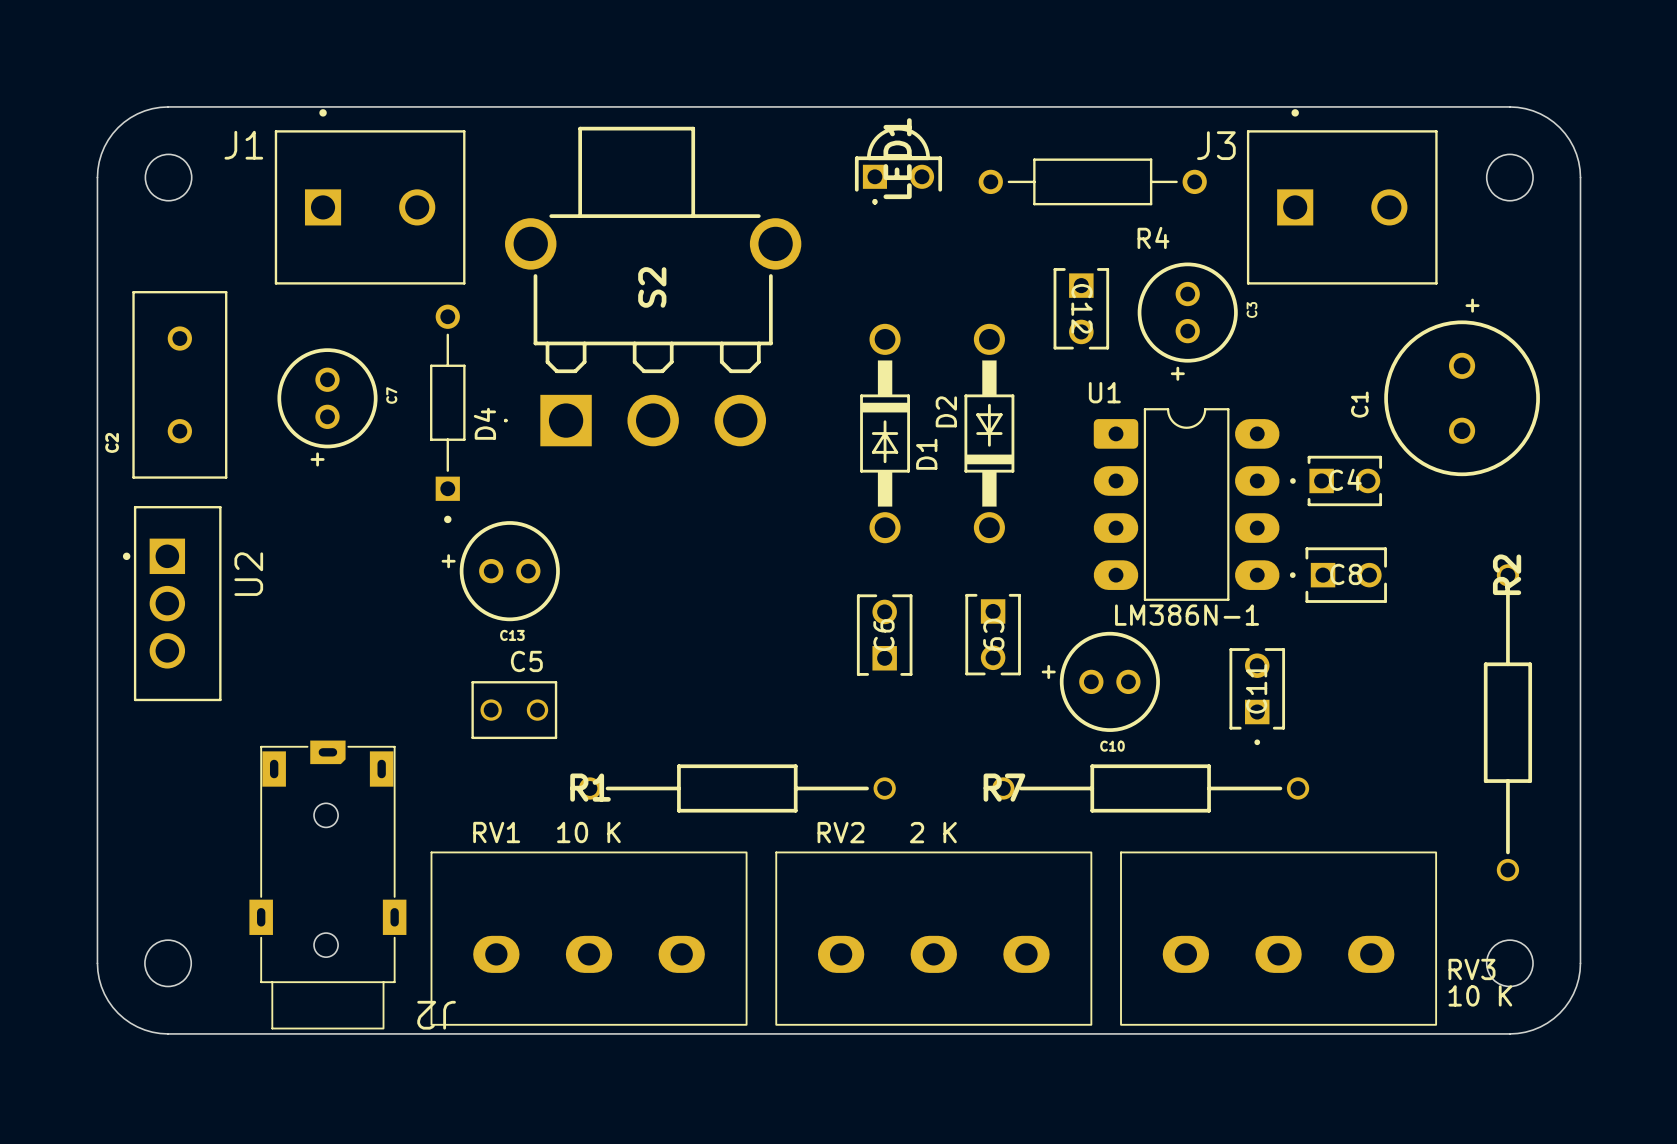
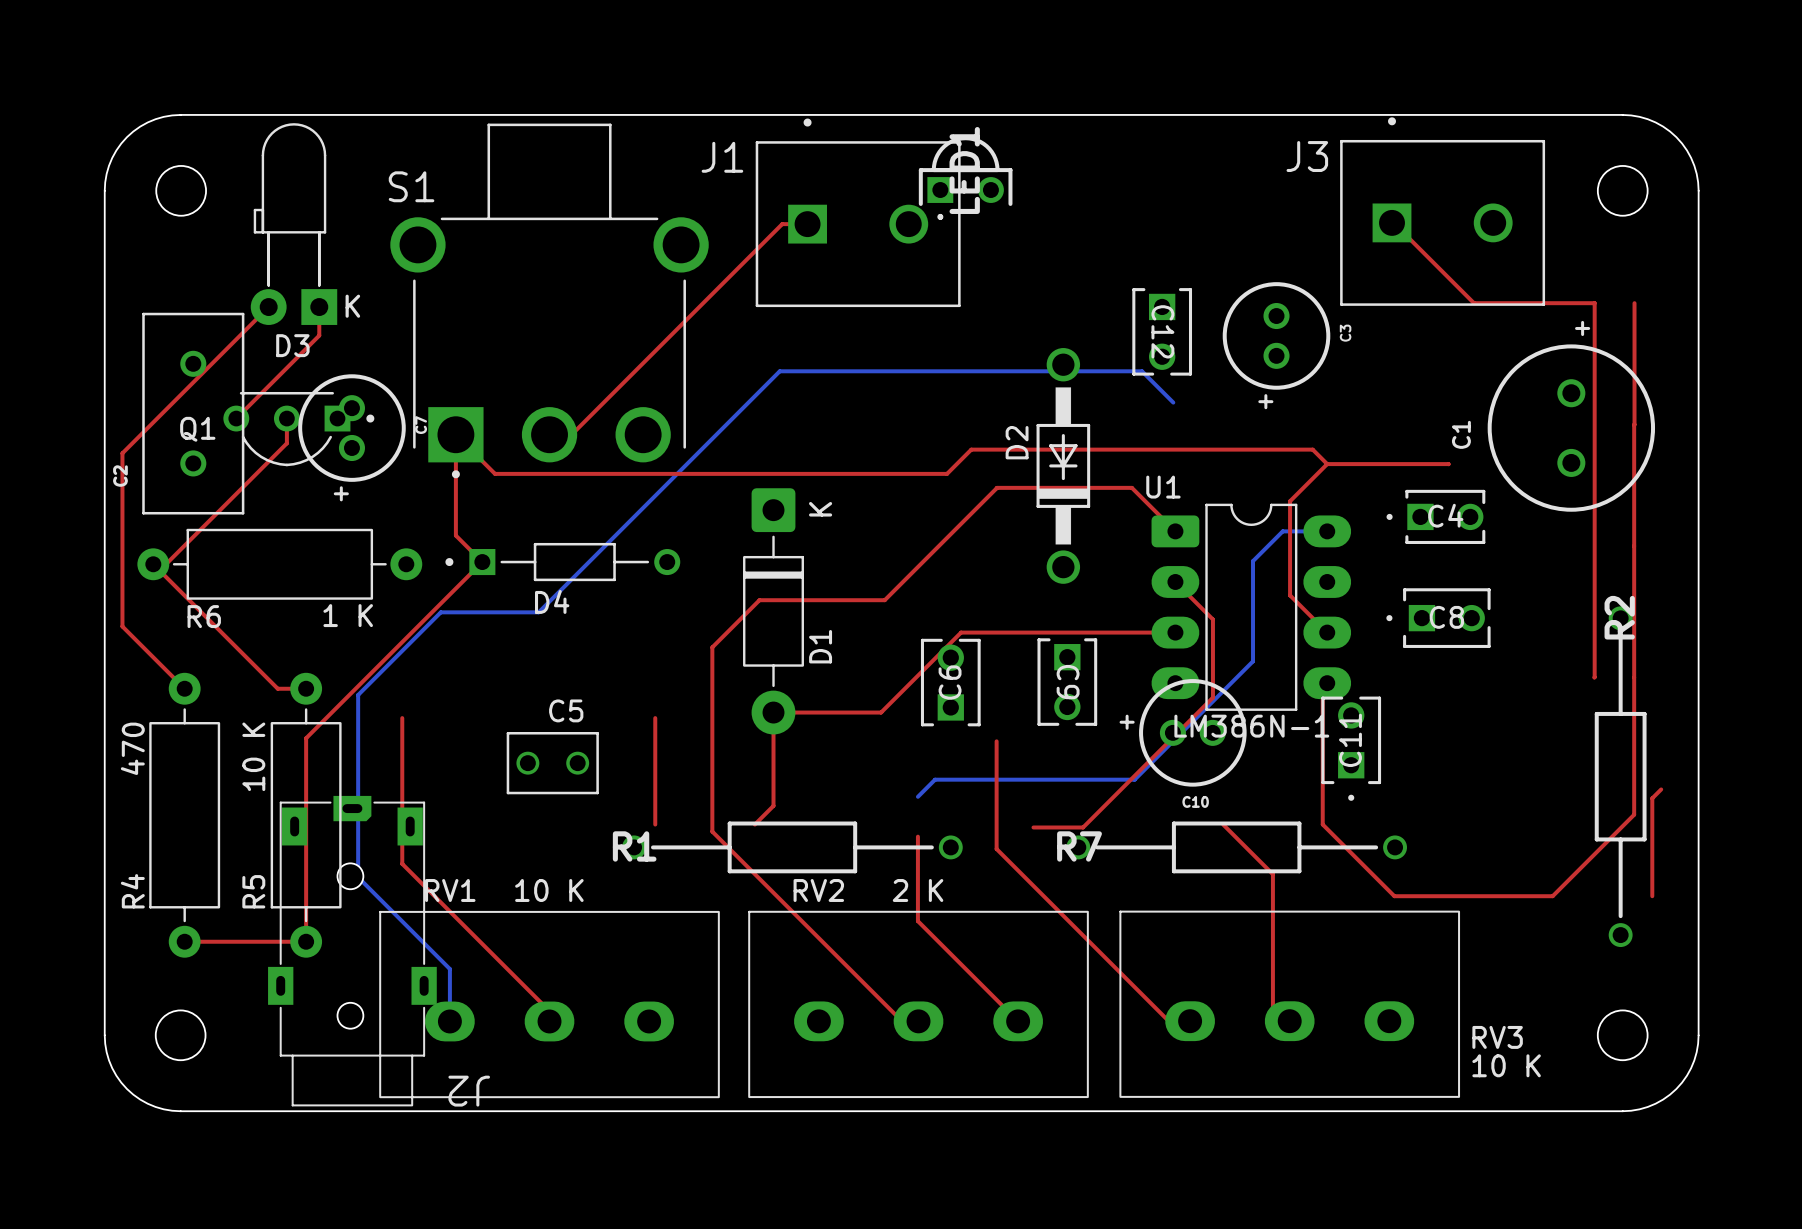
R4 footprint: [978, 158, 1207, 206] -> [149, 672, 221, 958]
top track: none -> (1392, 206) (1392, 221) (1473, 303) (1594, 303) (1594, 677)
J1 position: (370, 196) -> (858, 212)
D3: none -> (293, 224)
top track: none -> (807, 224) (782, 224) (571, 434) (549, 434)
R4 name position: R4 (1153, 237) -> R4 (132, 891)
S1: none -> (549, 300)
top track: none -> (1634, 303) (1634, 814) (1552, 896) (1394, 896) (1322, 824) (1322, 687) (1327, 683)
text: none -> K (352, 306)
top track: none -> (268, 307) (122, 453) (122, 626) (184, 688)
top track: none -> (319, 307) (319, 335) (236, 418)
S2: (652, 286) -> none
D1 footprint: [860, 323, 911, 544] -> [743, 488, 804, 735]
bottom track: none -> (1173, 402) (1142, 371) (779, 371) (538, 612) (440, 612) (358, 695) (358, 877) (449, 969) (449, 1021)
top track: none -> (286, 418) (286, 443) (165, 564) (153, 564) (277, 688) (306, 688)
Q1: none -> (298, 429)
D4 rotation: 0° (447, 413) -> 90° clockwise (562, 562)
D4 position: (447, 413) -> (562, 562)
top track: none -> (1327, 464) (1312, 449) (971, 449) (947, 473) (495, 473) (455, 434) (455, 535) (482, 562) (306, 738) (306, 941) (184, 941)
top track: none -> (1327, 464) (1290, 501) (1290, 595) (1327, 632)
top track: none -> (1327, 464) (1448, 464)
top track: none -> (1175, 531) (1131, 487) (997, 487) (884, 600) (759, 600) (712, 647) (712, 831) (901, 1021) (920, 1021)
bottom track: none -> (1327, 531) (1282, 531) (1253, 561) (1253, 661) (1134, 779) (935, 779) (917, 796)
U1 position: (1186, 504) -> (1251, 607)
R6: none -> 1 K (279, 564)
top track: none -> (1175, 581) (1212, 619) (1212, 697) (1083, 827) (1033, 827)
C13: (509, 571) -> none
top track: none -> (1175, 632) (961, 632) (881, 712) (773, 712) (773, 805) (754, 824)
U2: (172, 603) -> none
top track: none -> (402, 718) (402, 863) (564, 1025)
top track: none -> (655, 718) (655, 824)
top track: none -> (996, 741) (996, 849) (1173, 1025)
R4 value: none -> 470 (132, 748)
top track: none -> (1661, 789) (1652, 798) (1652, 896)
R5: none -> 10 K (306, 815)
top track: none -> (1223, 824) (1272, 874) (1272, 1025)
top track: none -> (917, 836) (917, 921) (1018, 1021)
RV1 position: (589, 938) -> (549, 1004)
RV2 position: (933, 938) -> (918, 1004)
RV3 position: (1278, 938) -> (1289, 1004)

